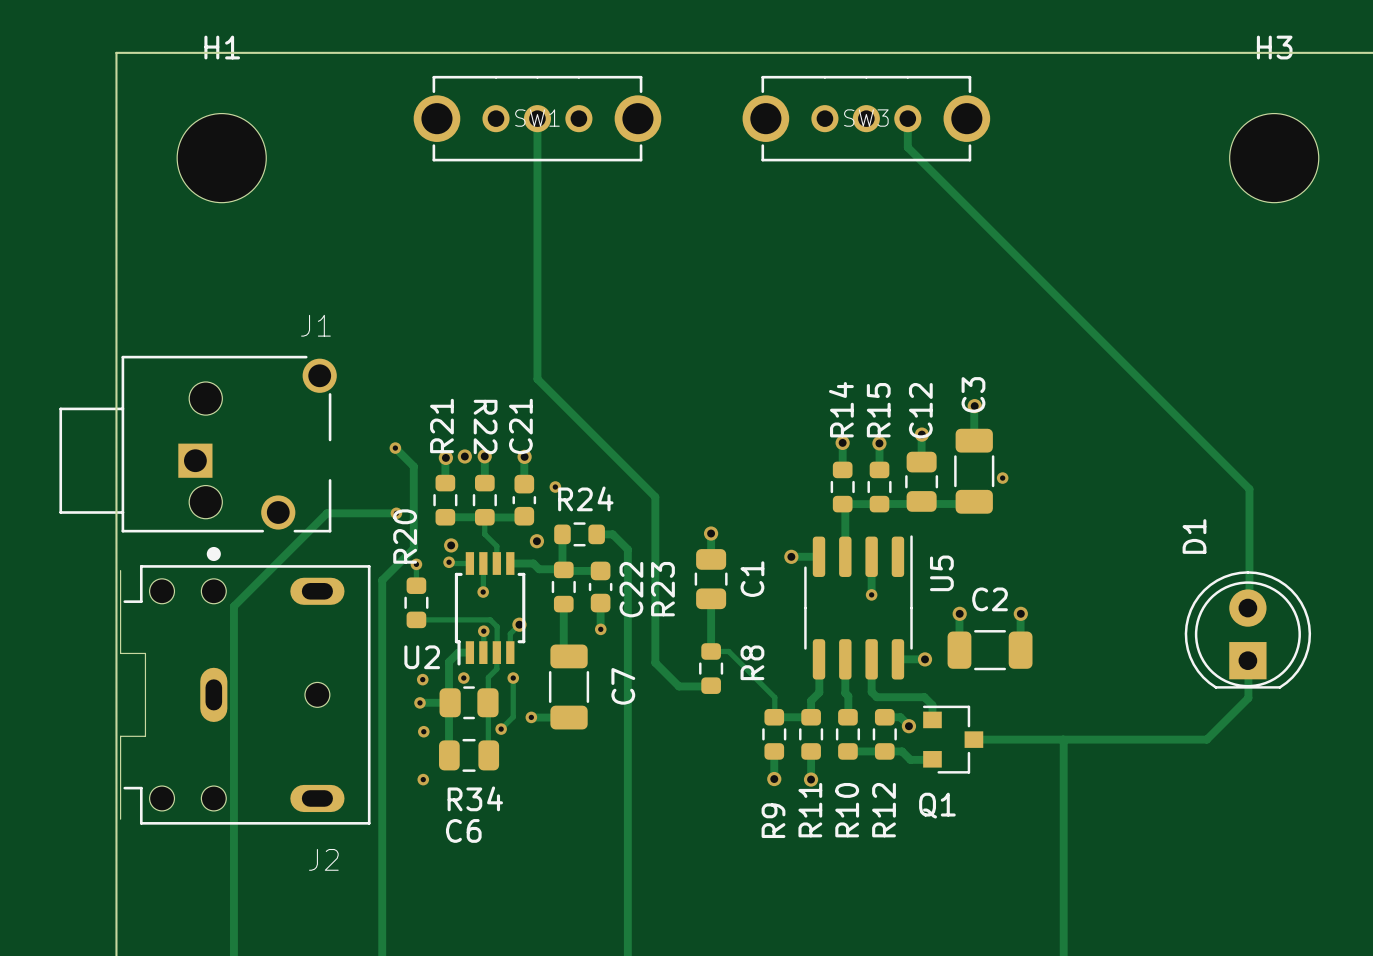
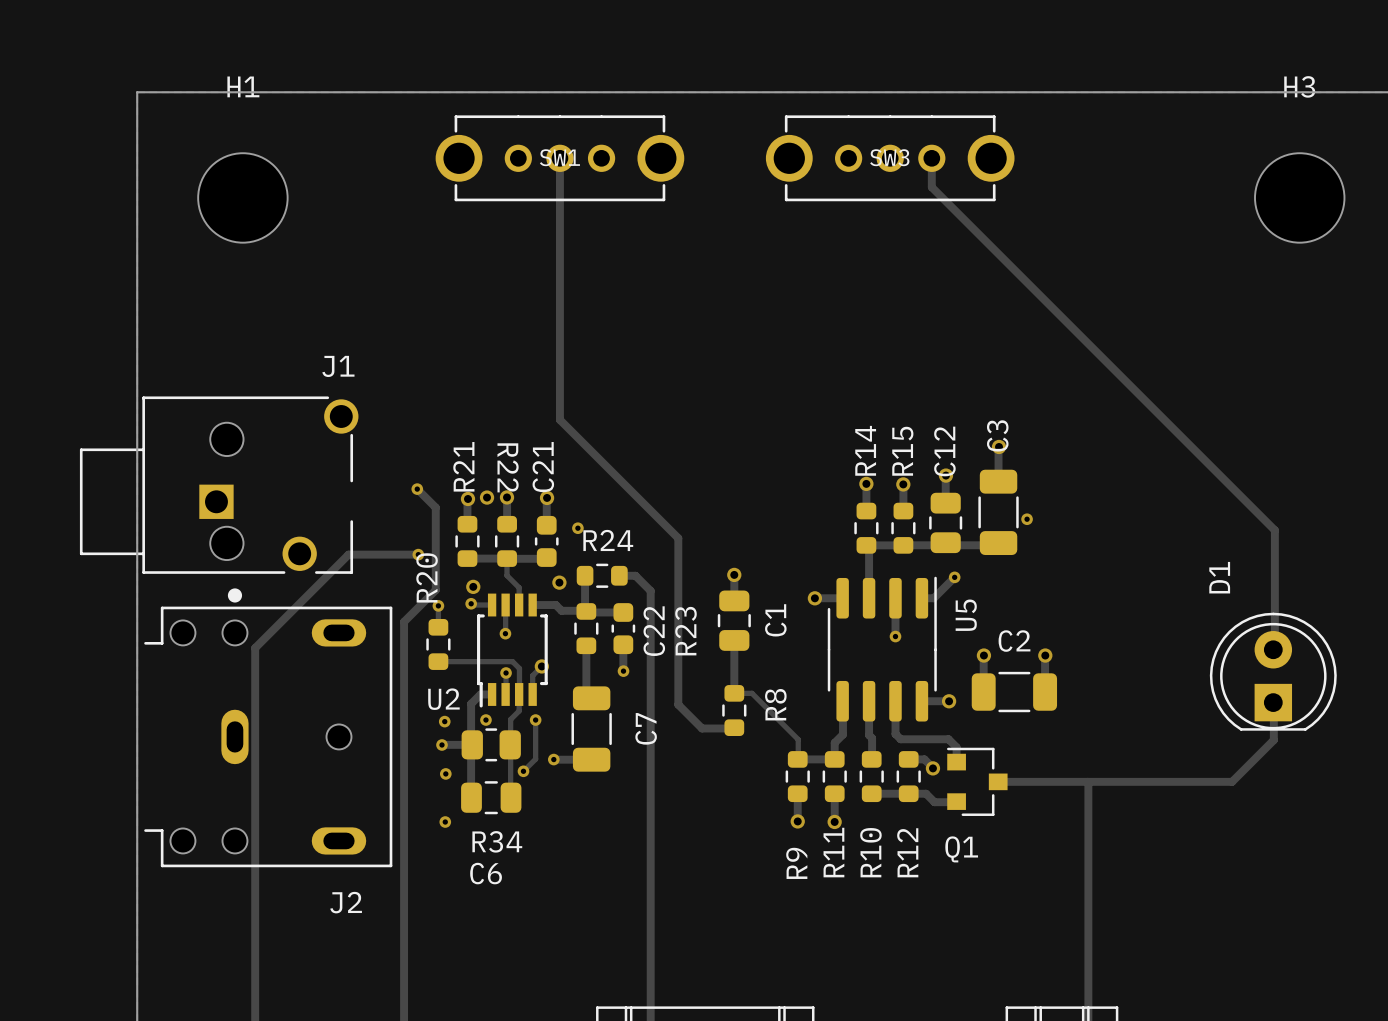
track: none -> (954, 577) (933, 598) (921, 598)
via: none -> (954, 577)
J1 footprint: [120, 546, 371, 825] -> [144, 588, 393, 868]

